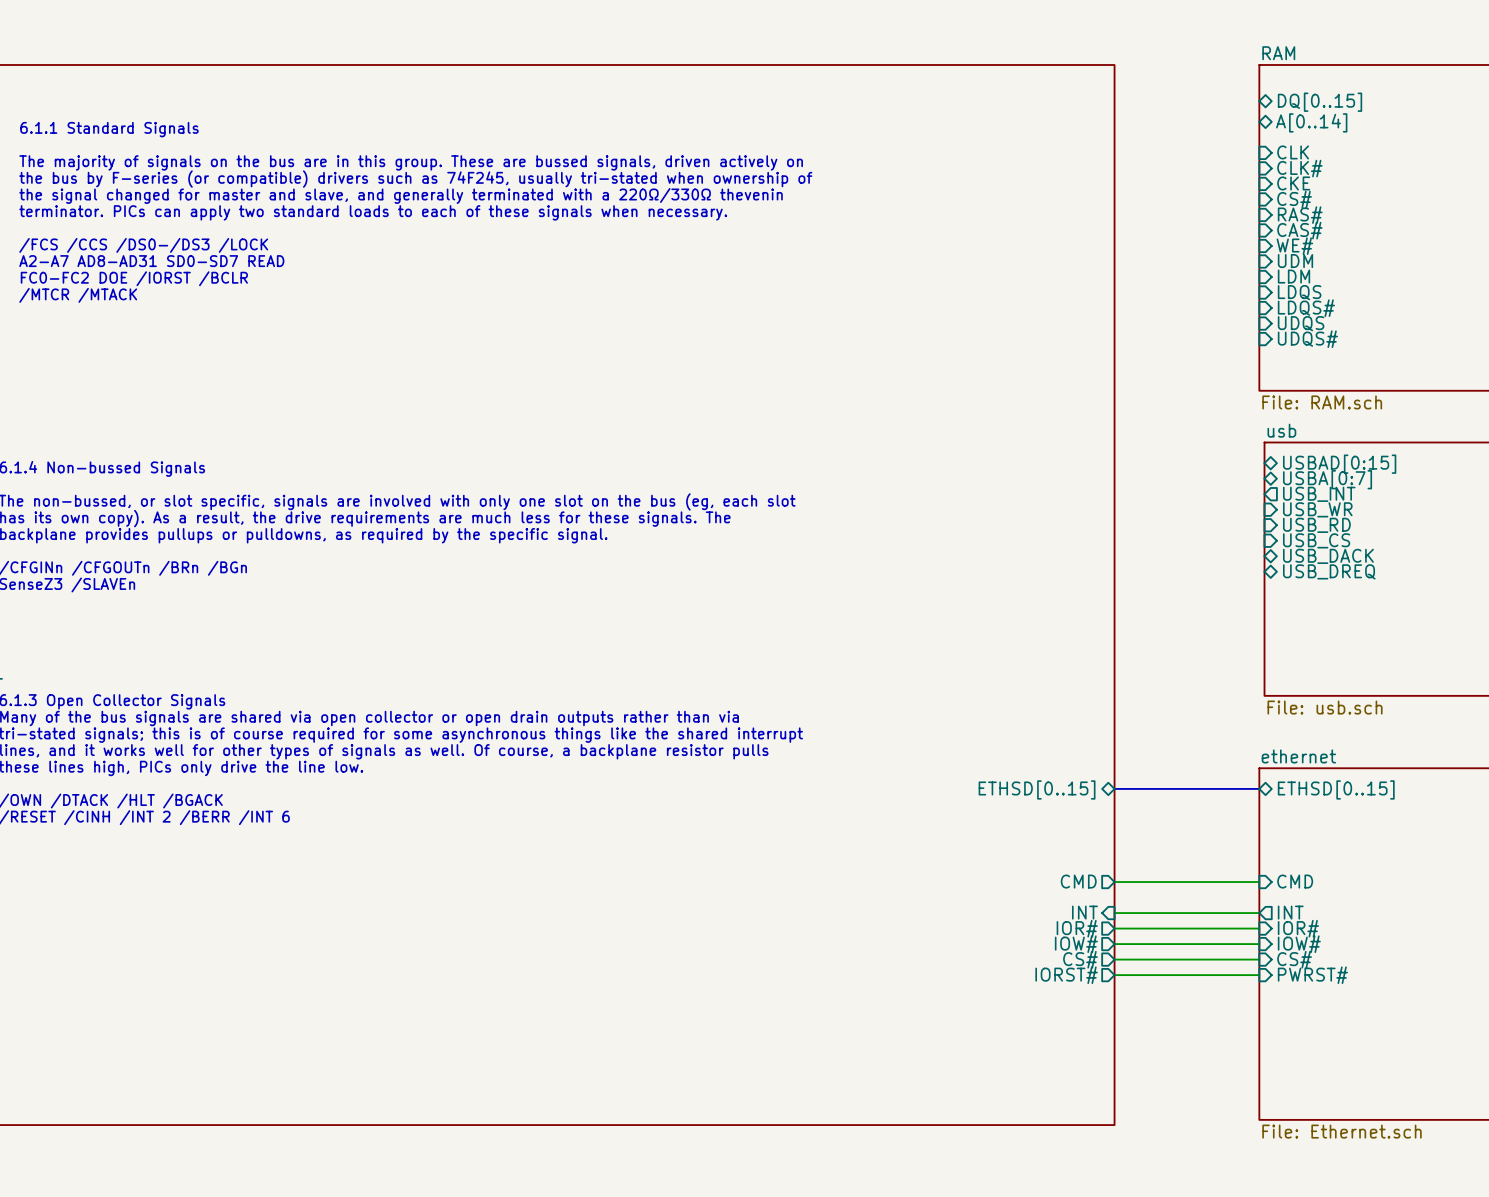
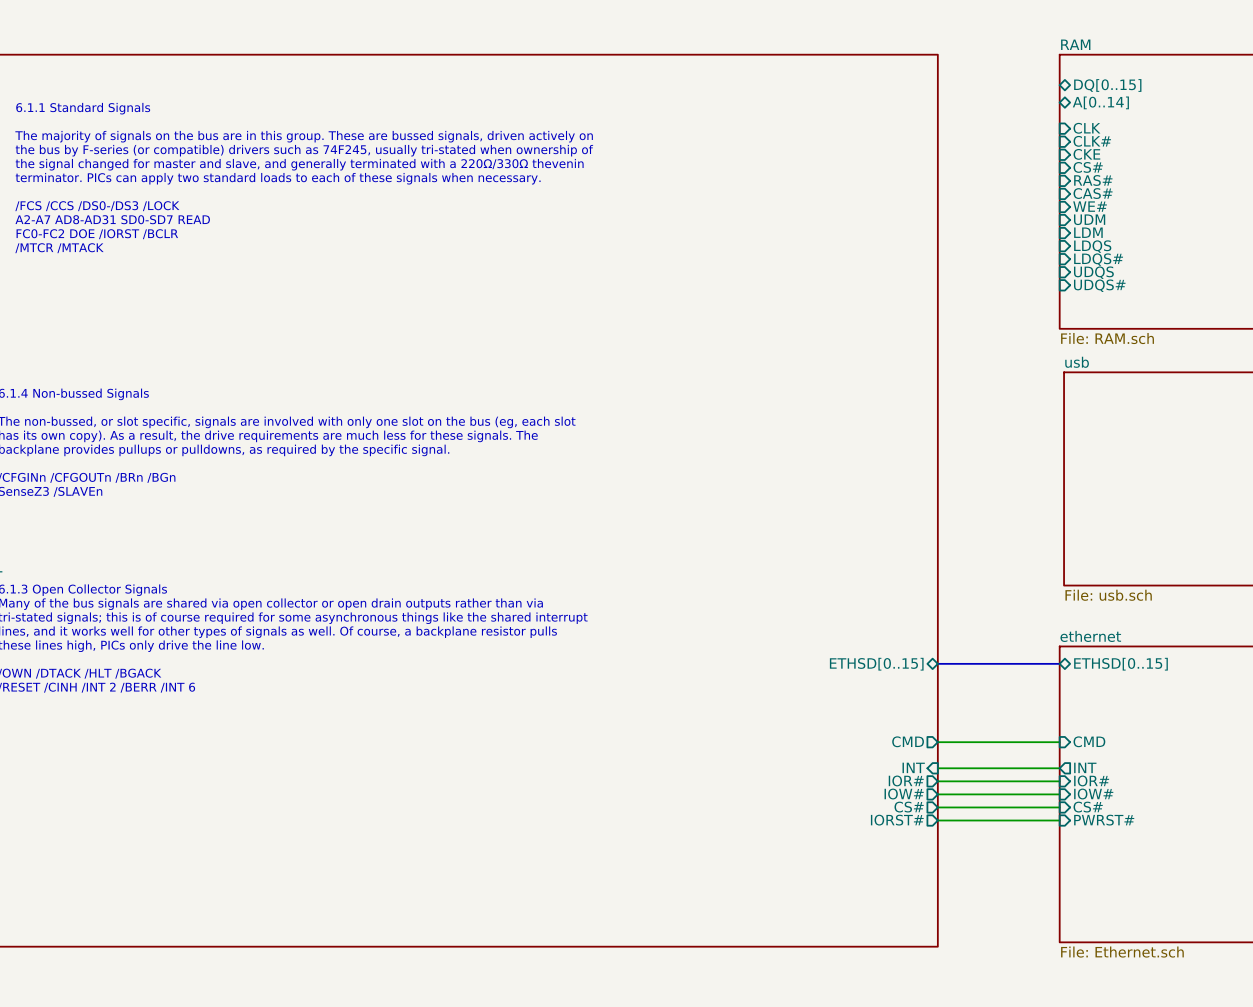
sheet pin: USBAD[0:15] (1339, 464) -> none
sheet pin: USBA[0:7] (1327, 479) -> none
sheet pin: USB_INT (1319, 494) -> none
sheet pin: USB_WR (1317, 509) -> none
sheet pin: USB_RD (1316, 525) -> none
sheet pin: USB_CS (1316, 540) -> none
sheet pin: USB_DACK (1328, 556) -> none
sheet pin: USB_DREQ (1329, 571) -> none

